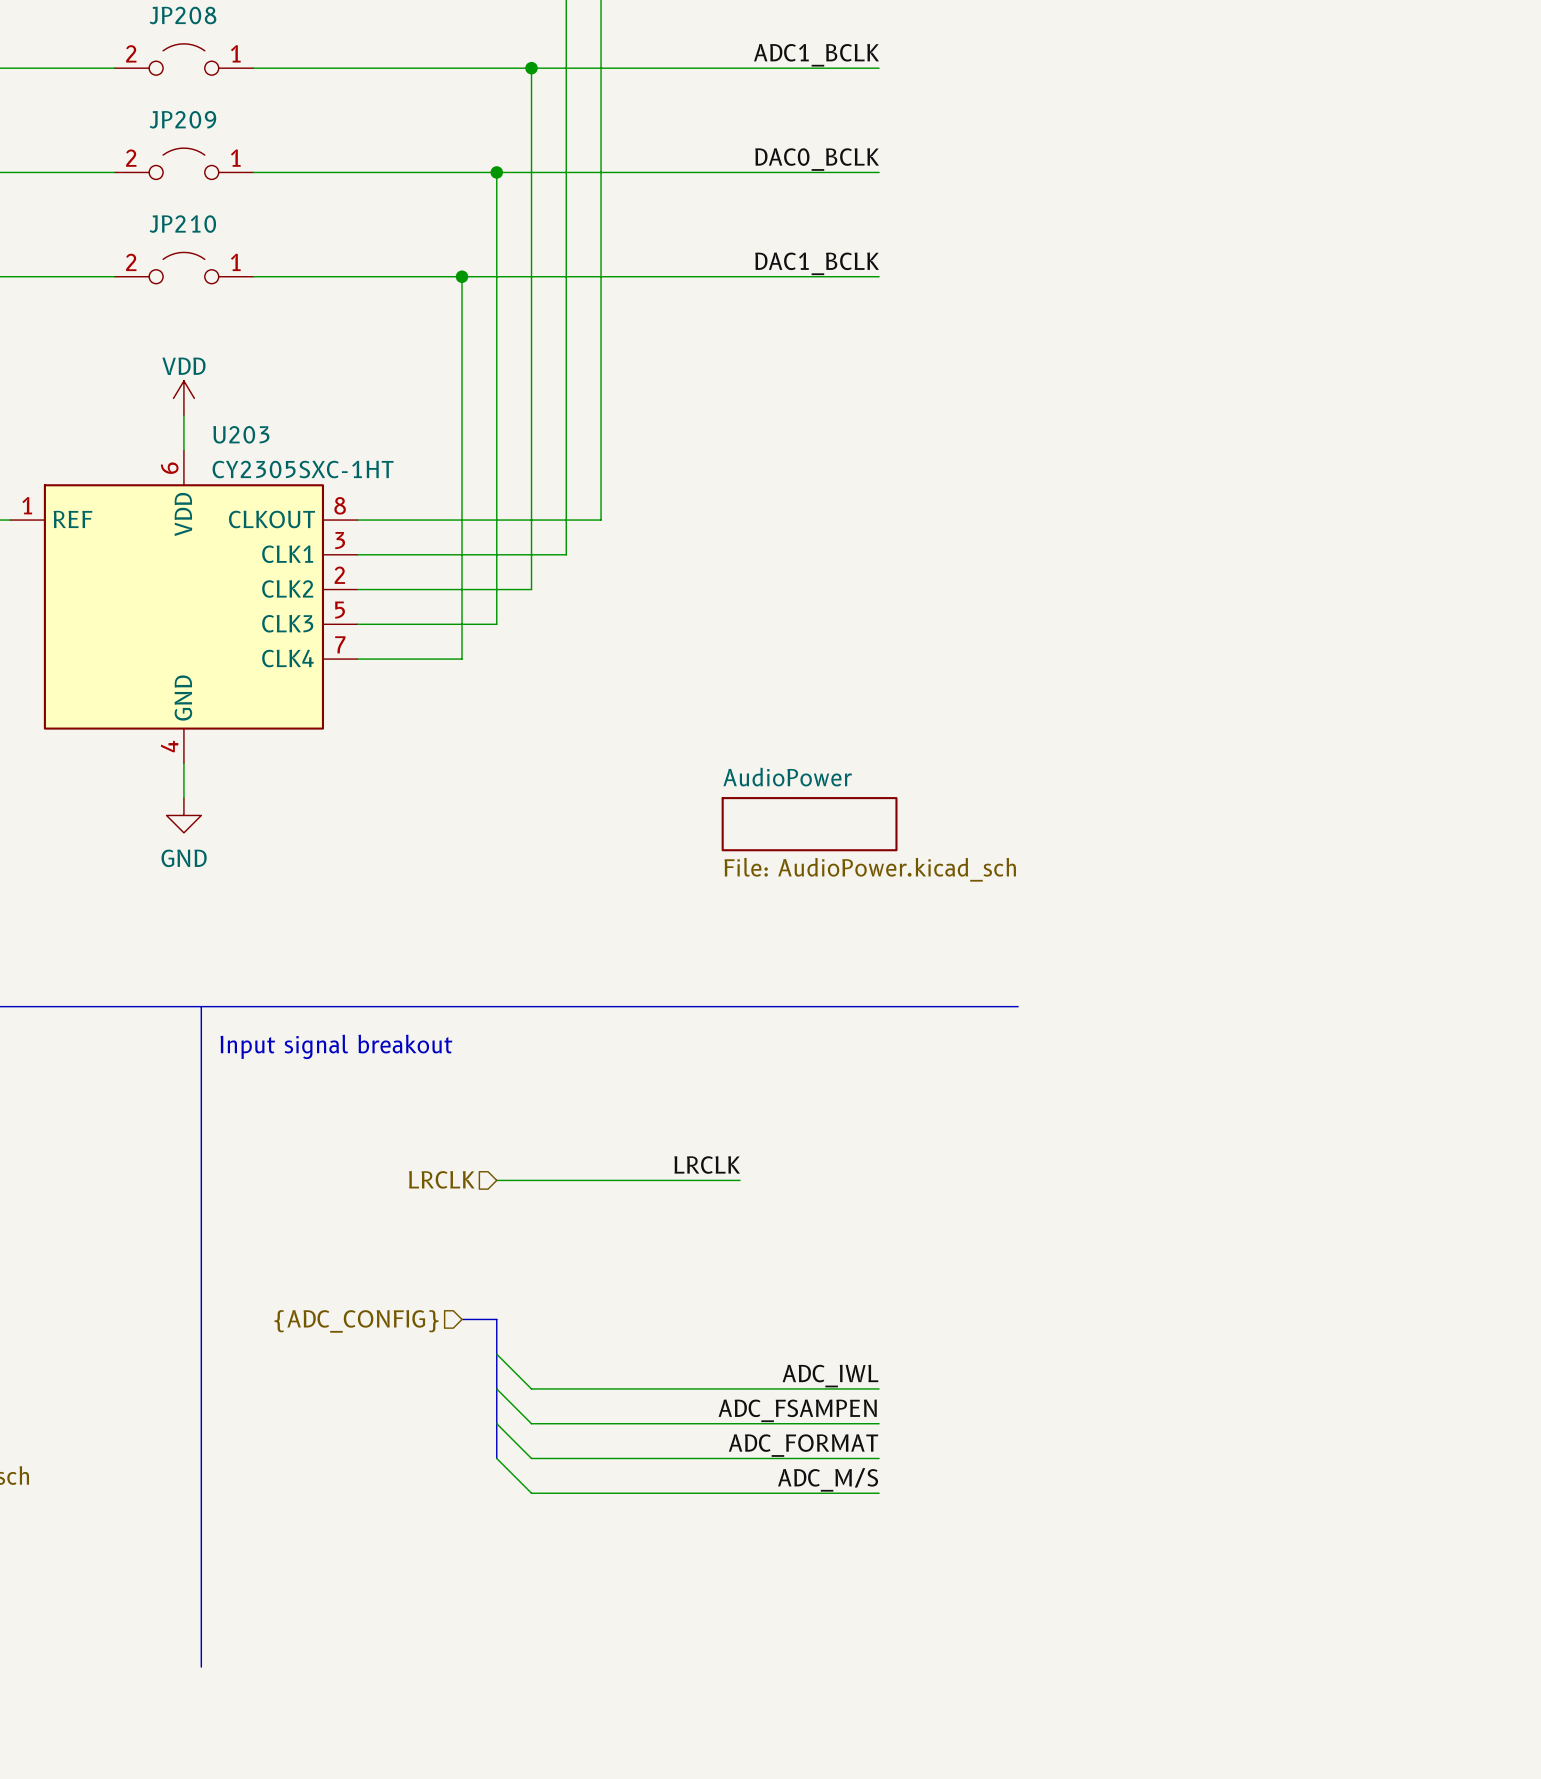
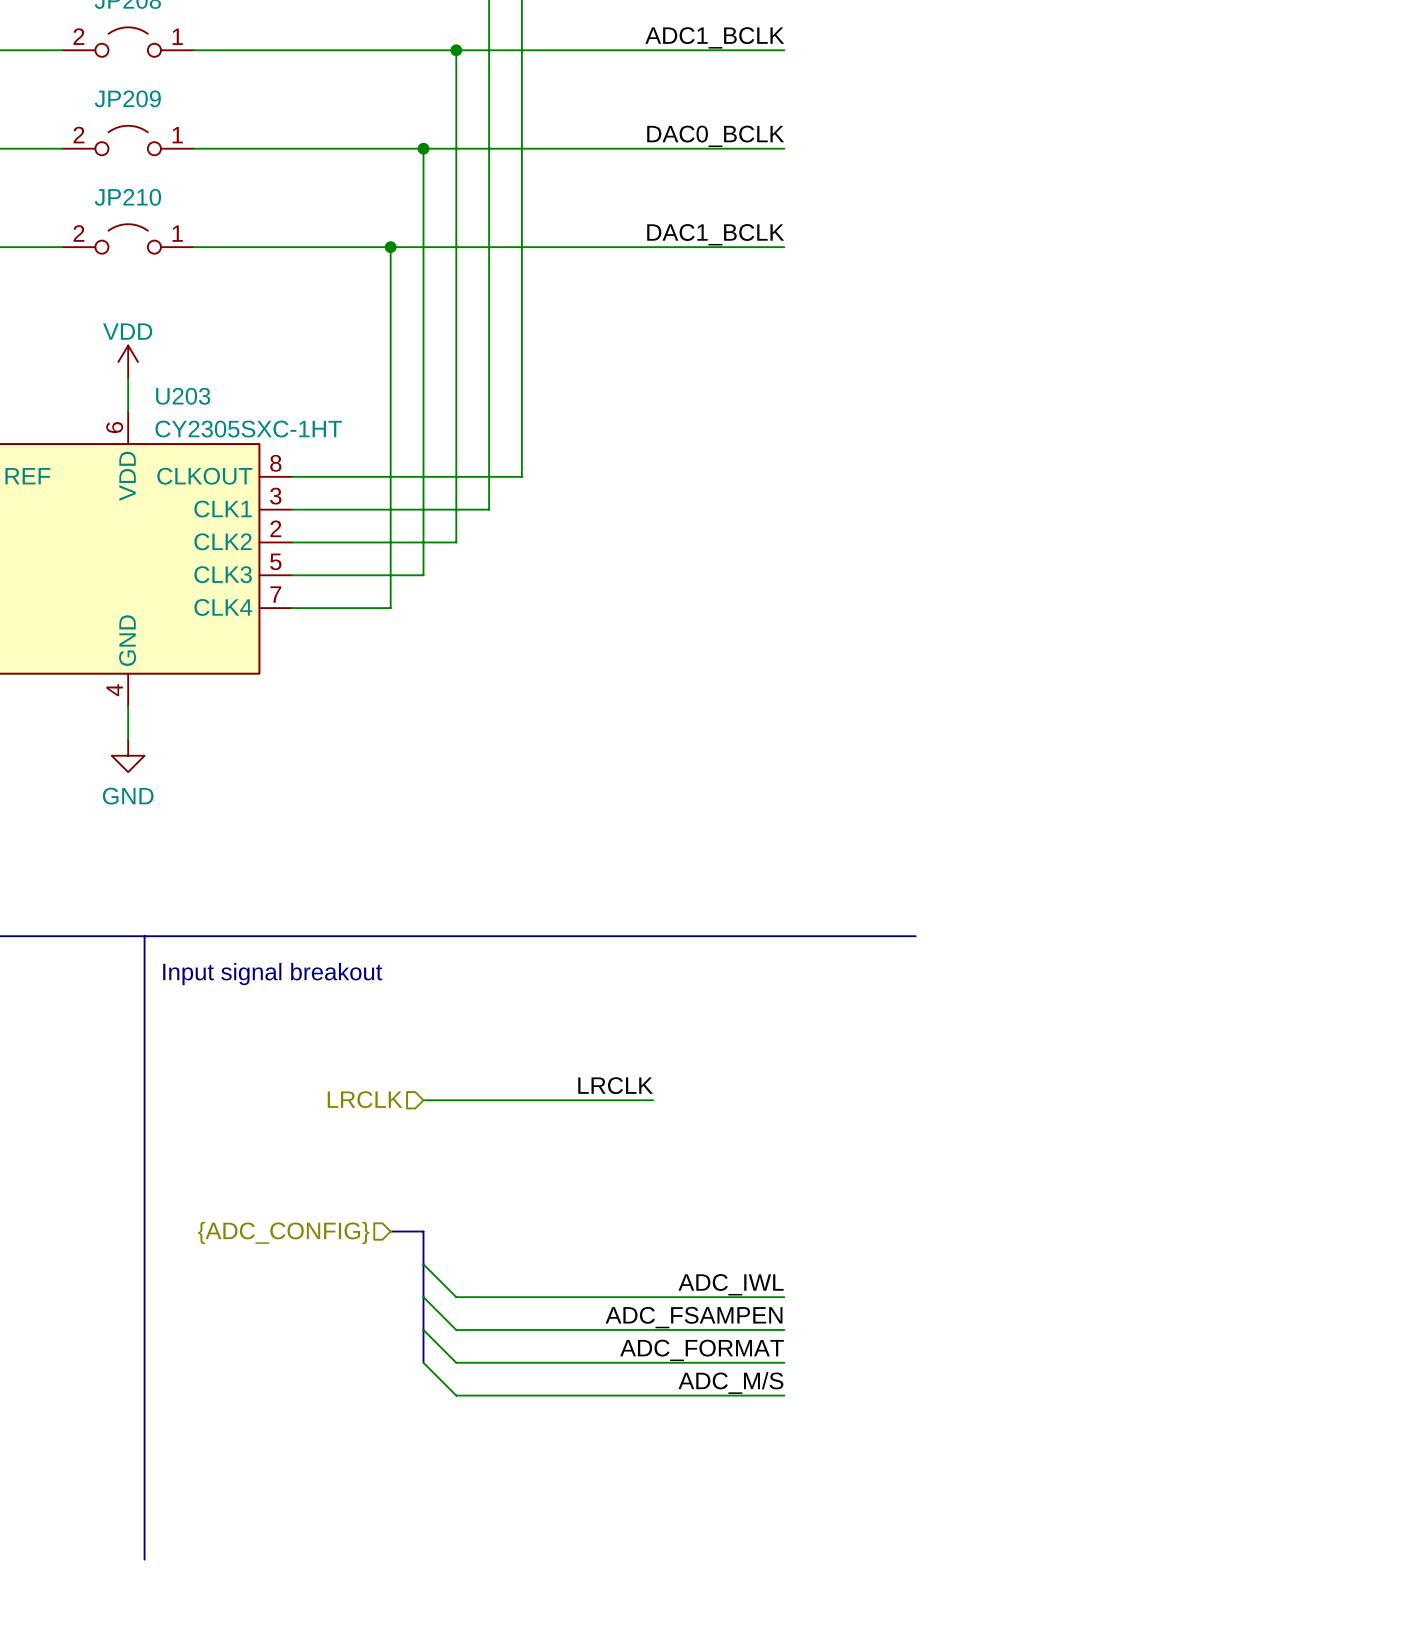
sheet AudioPower: File: AudioPower.kicad_sch (809, 824) -> none

